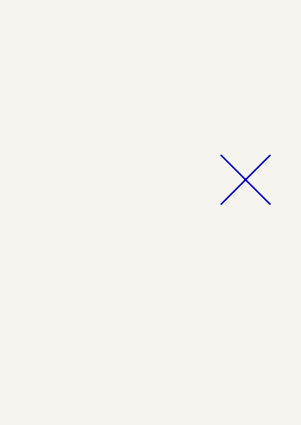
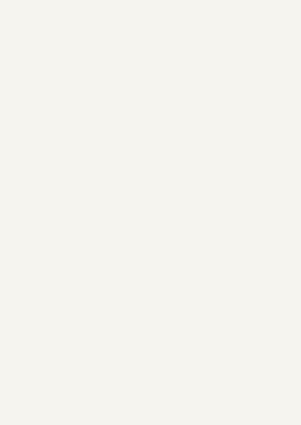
no-connect mark: (245, 179) -> none

